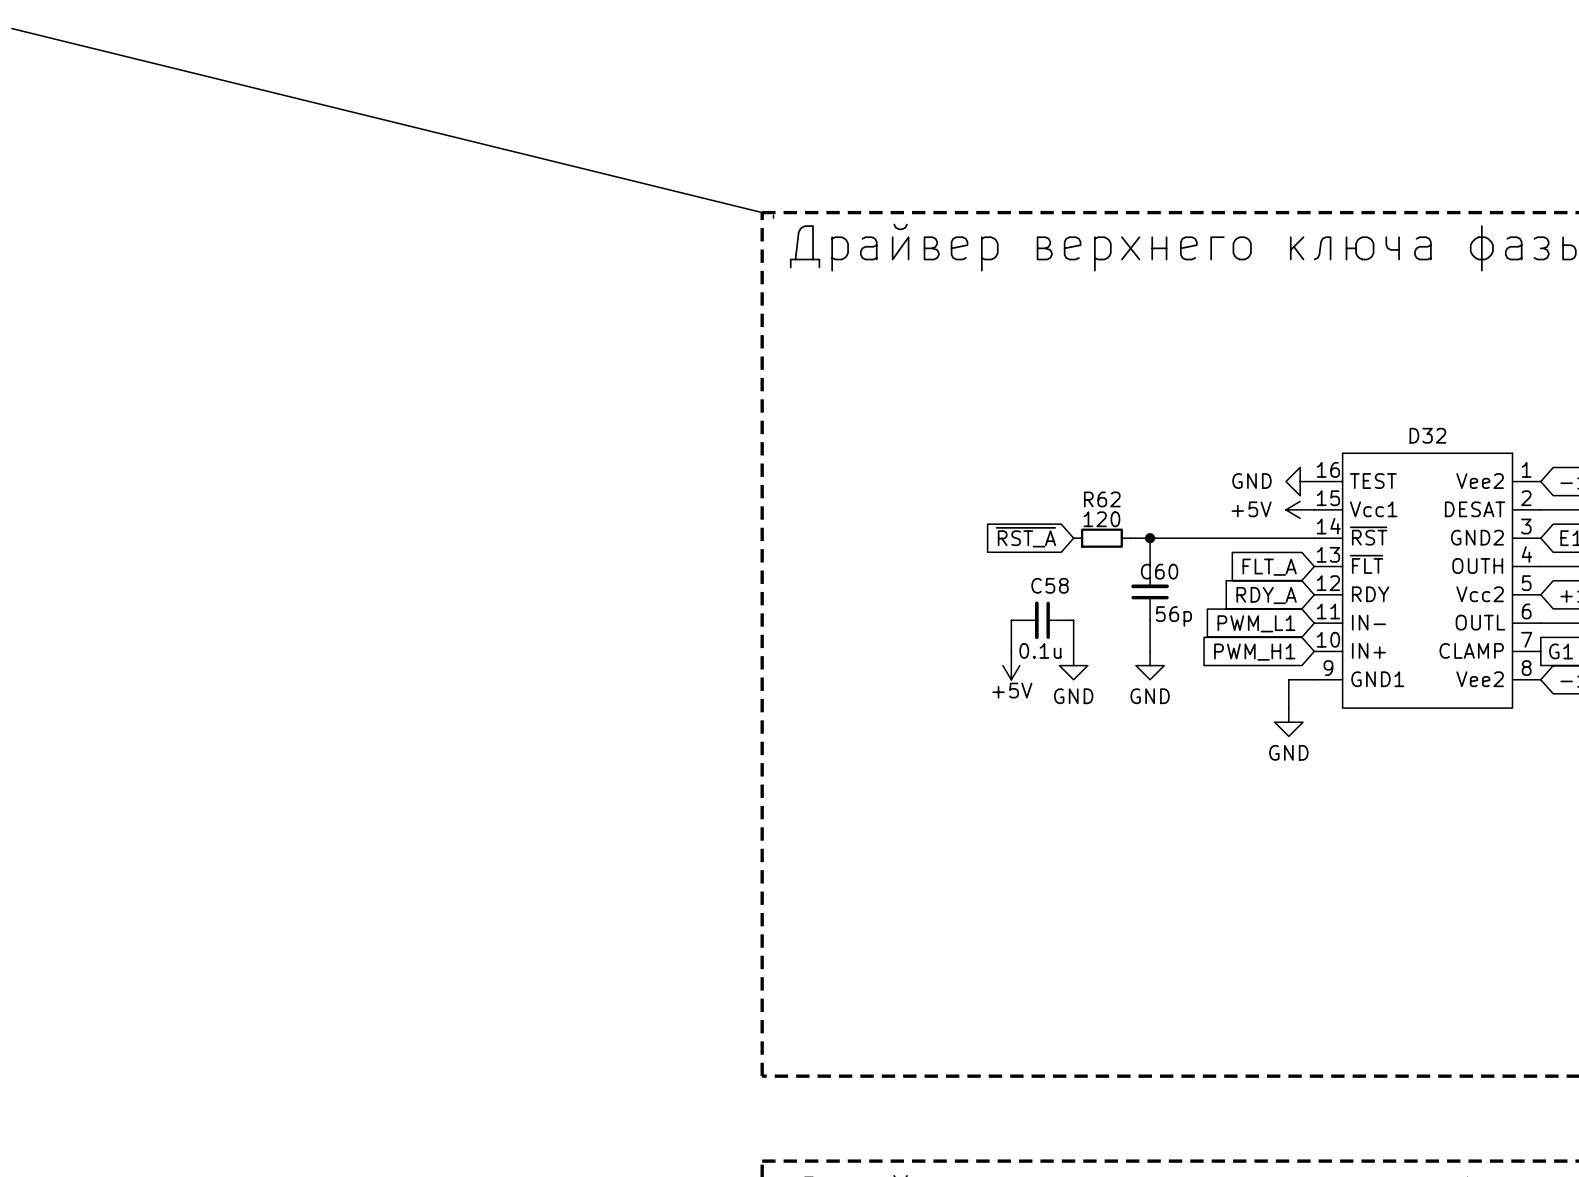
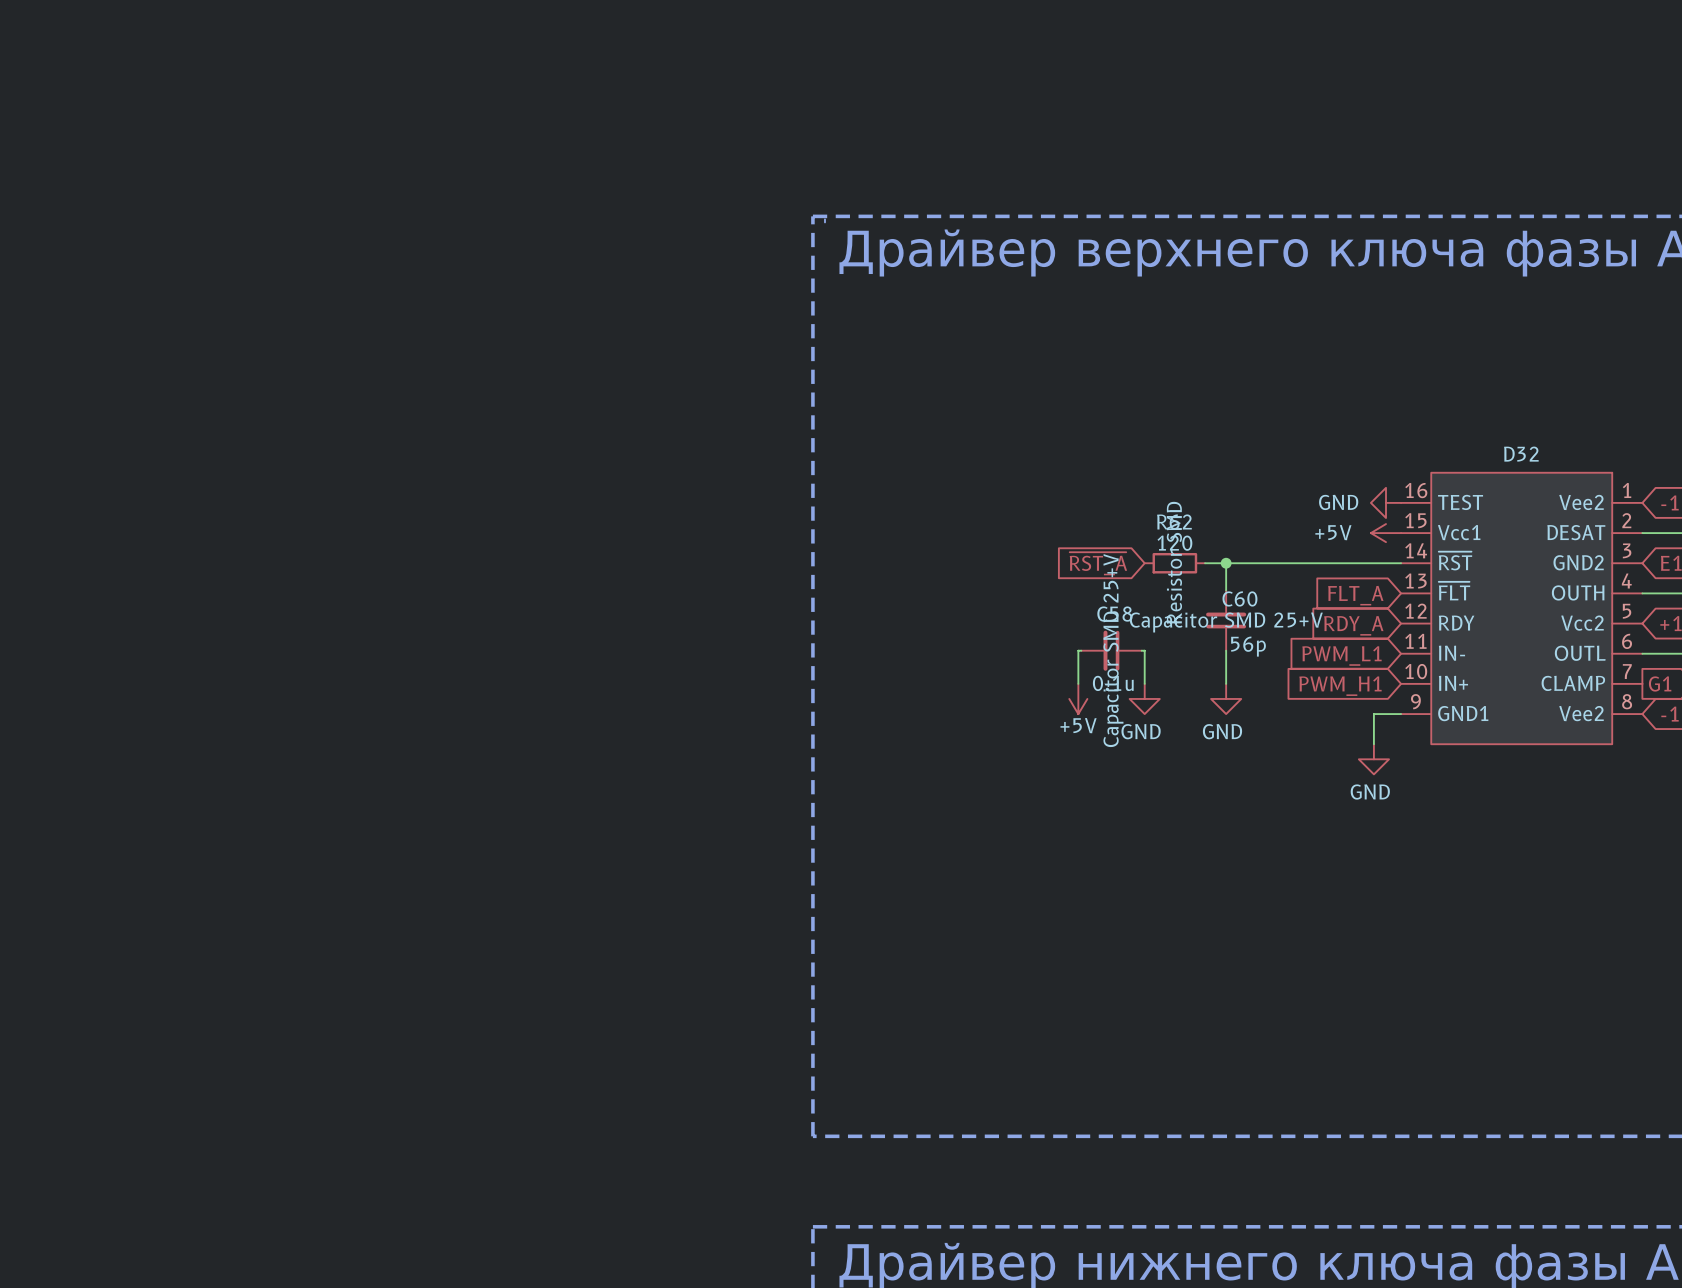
line: (11, 28) (762, 212) -> none
R62 text: none -> Resistor SMD (1174, 562)
C60 text: none -> Capacitor SMD 25+V (1226, 622)
C58 text: none -> Capacitor SMD 25+V (1113, 650)

